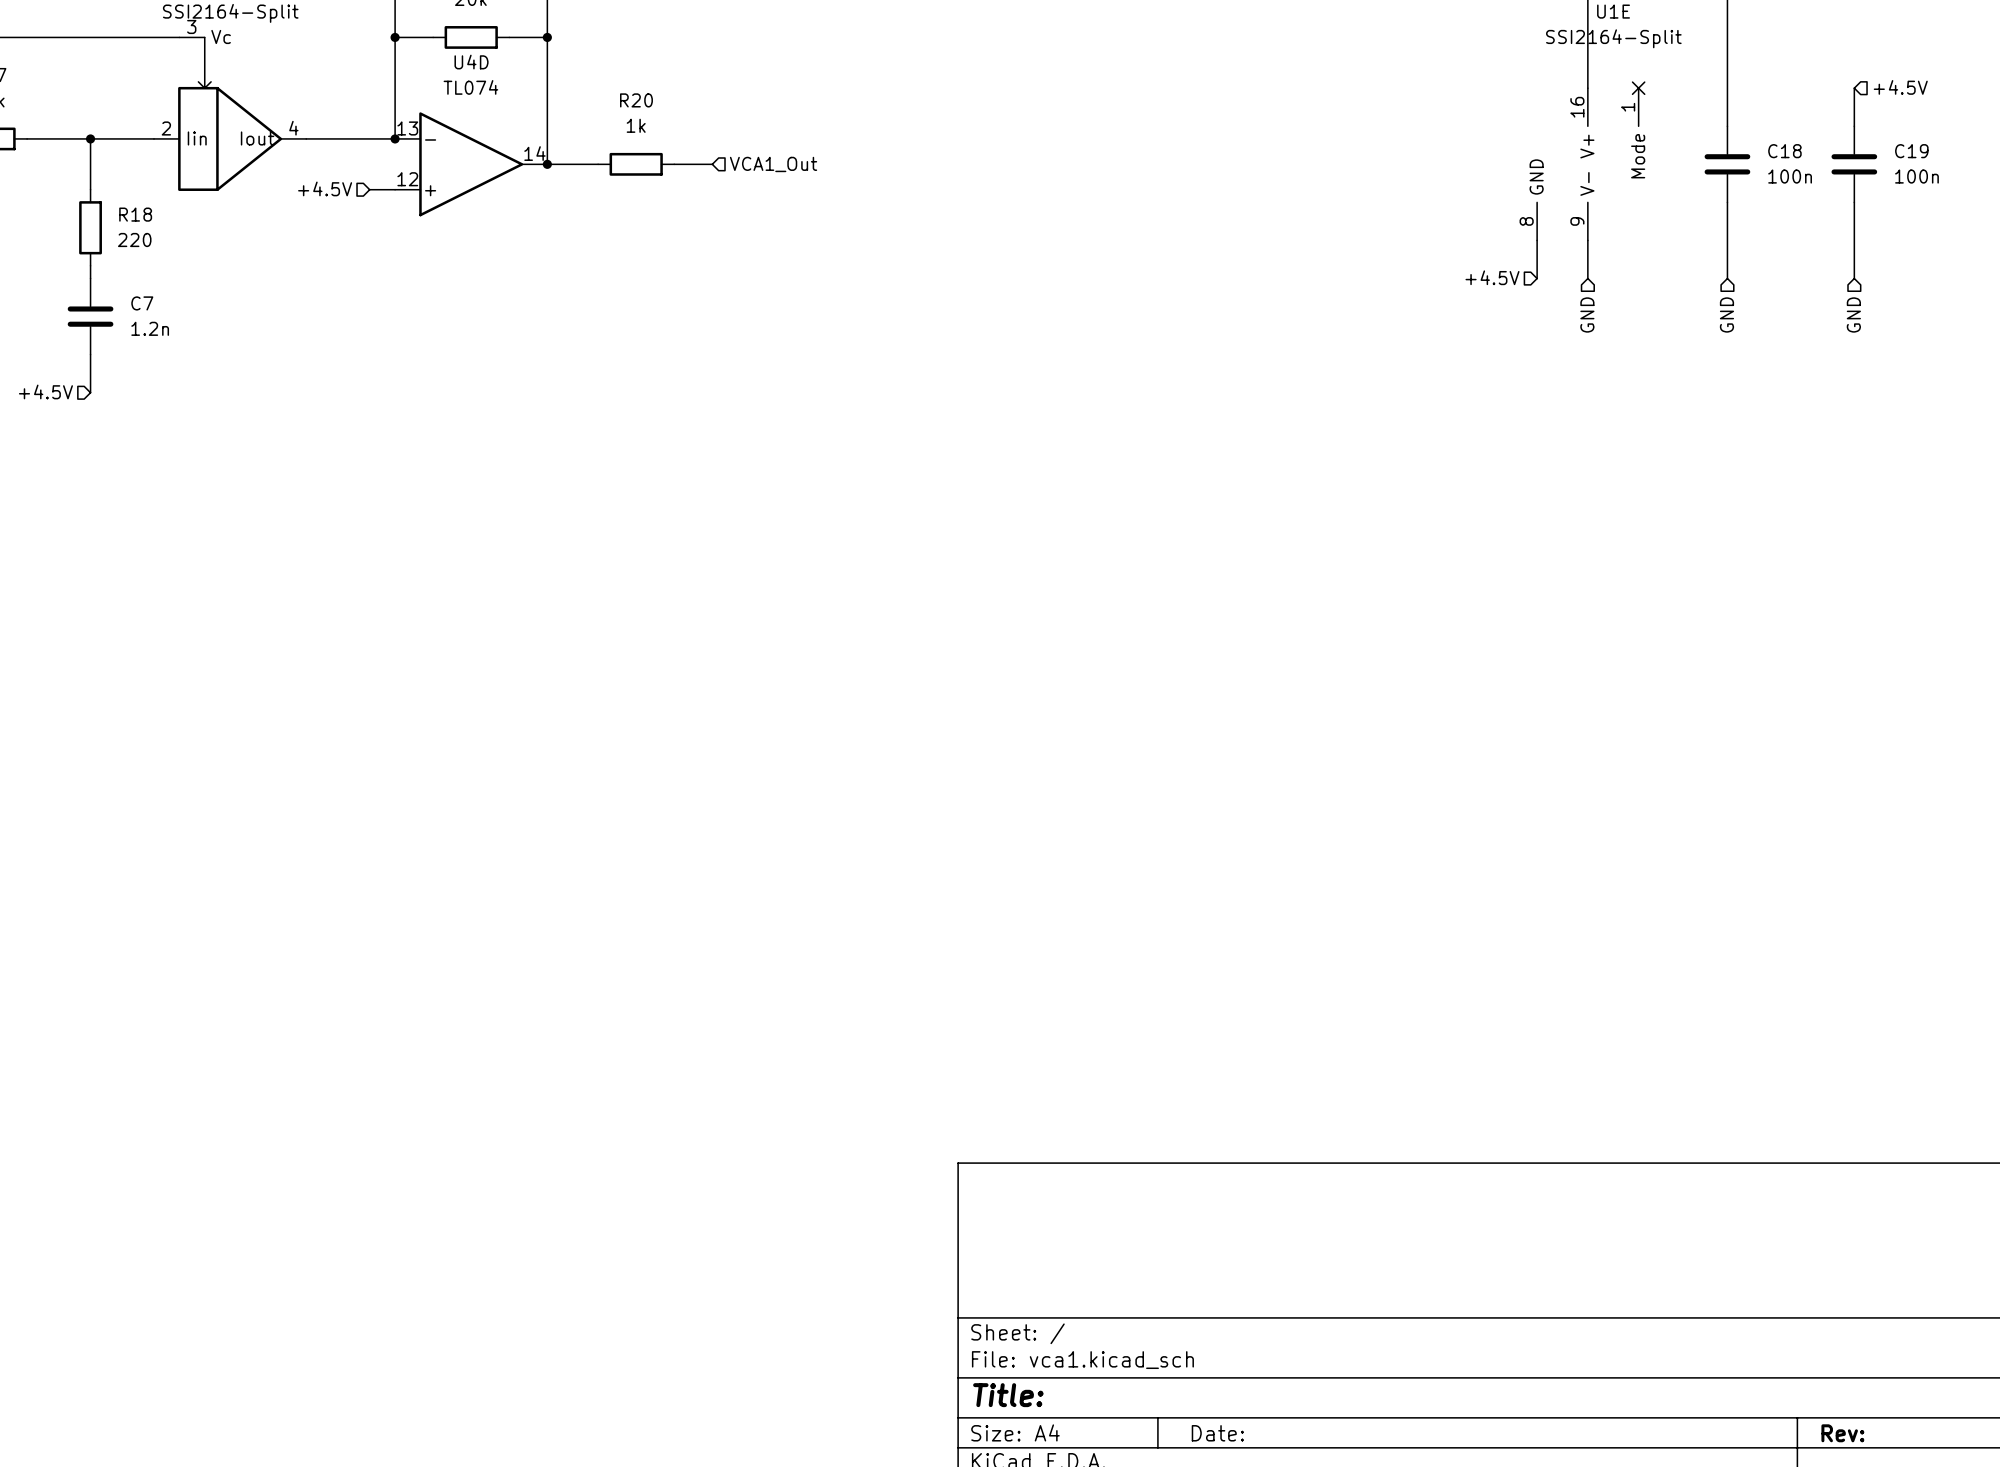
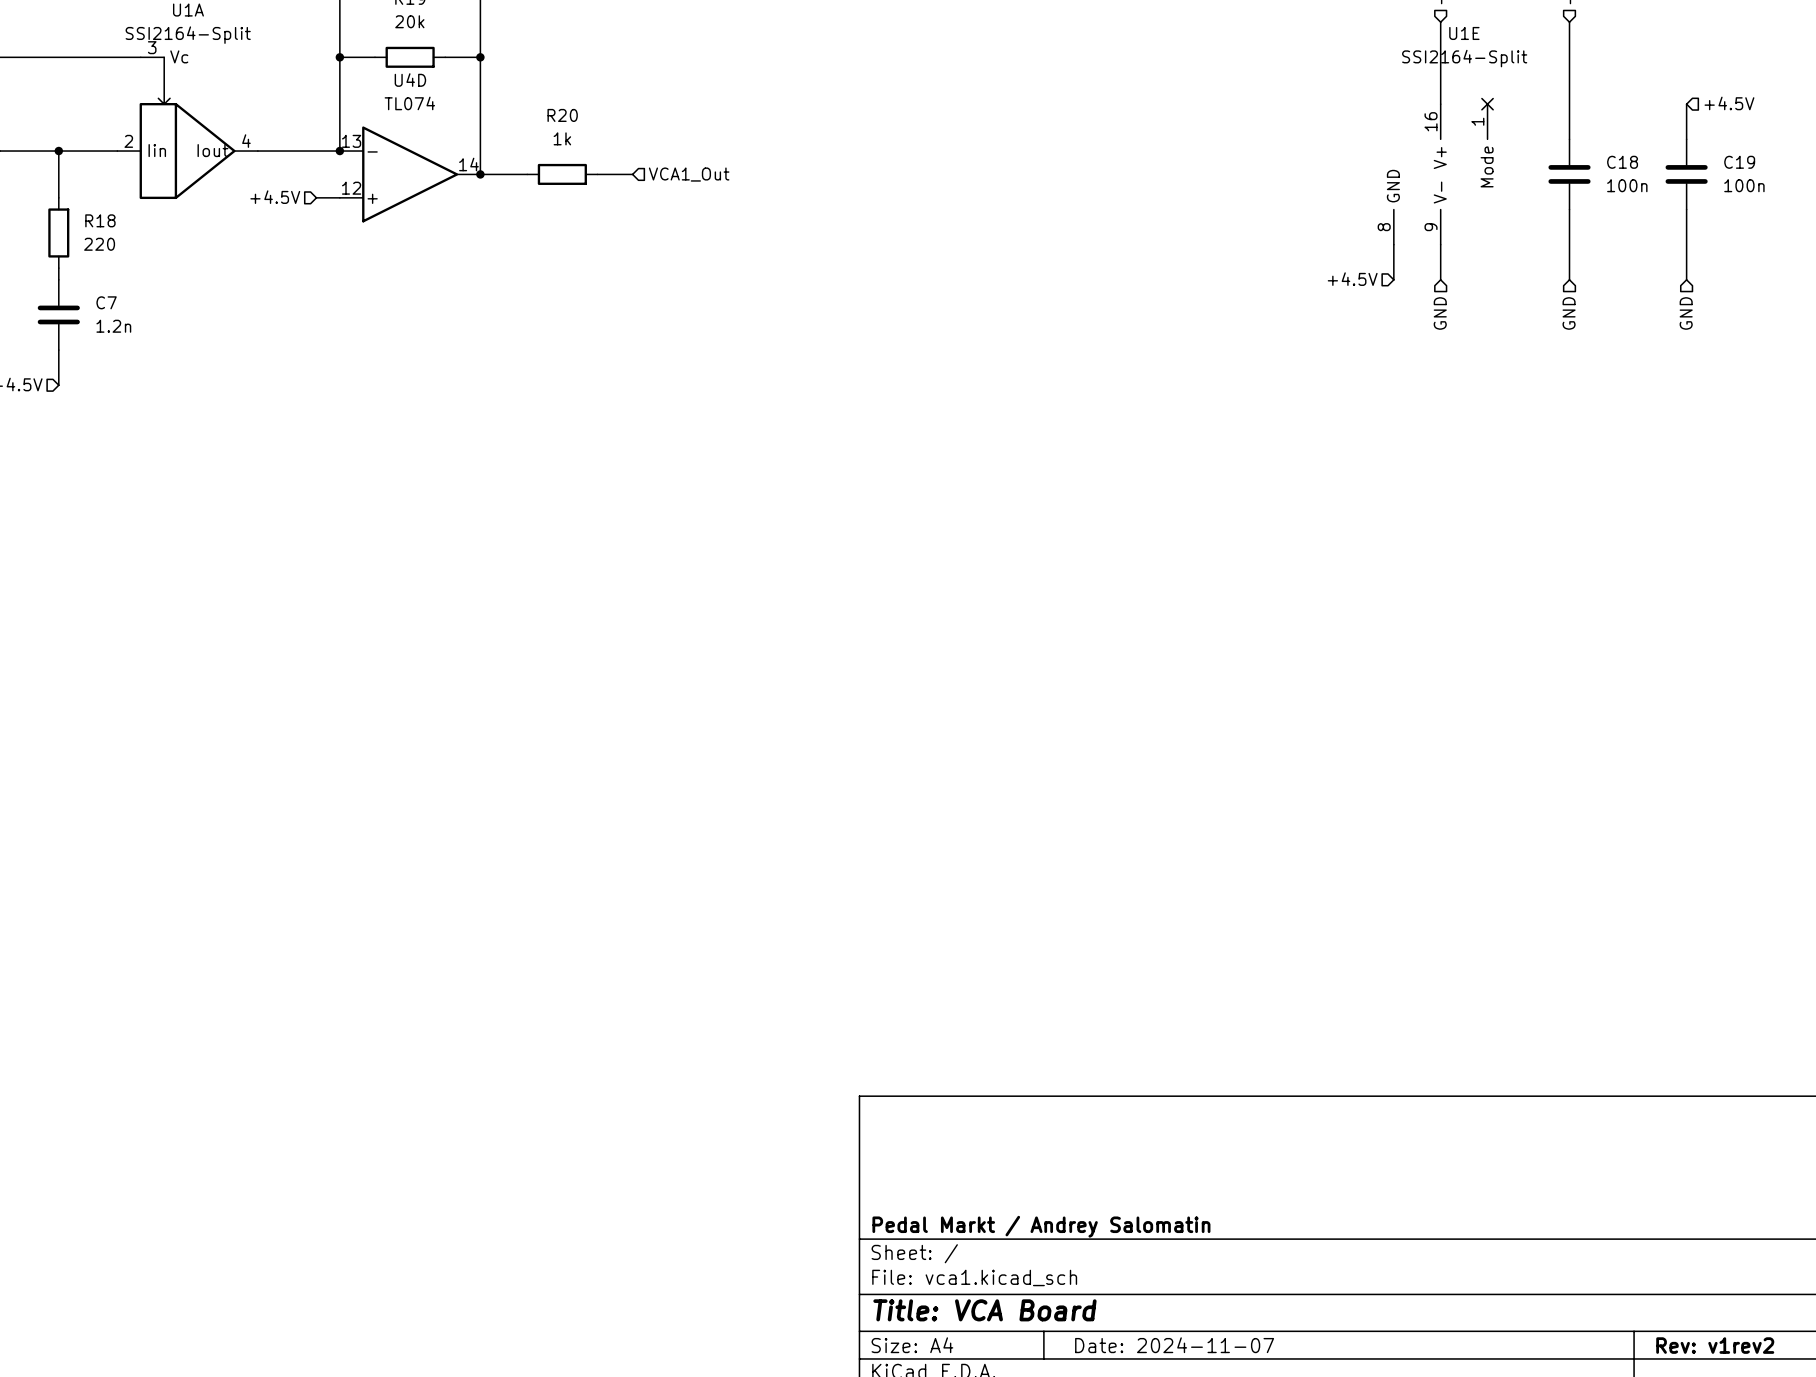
title block: none -> Pedal Markt / Andrey Salomatin (1041, 1226)
title block: Title: (1008, 1395) -> Title: VCA Board (984, 1310)
title block: Date: (1217, 1433) -> Date: 2024-11-07 (1174, 1345)
title block: Rev: (1842, 1433) -> Rev: v1rev2 (1715, 1345)

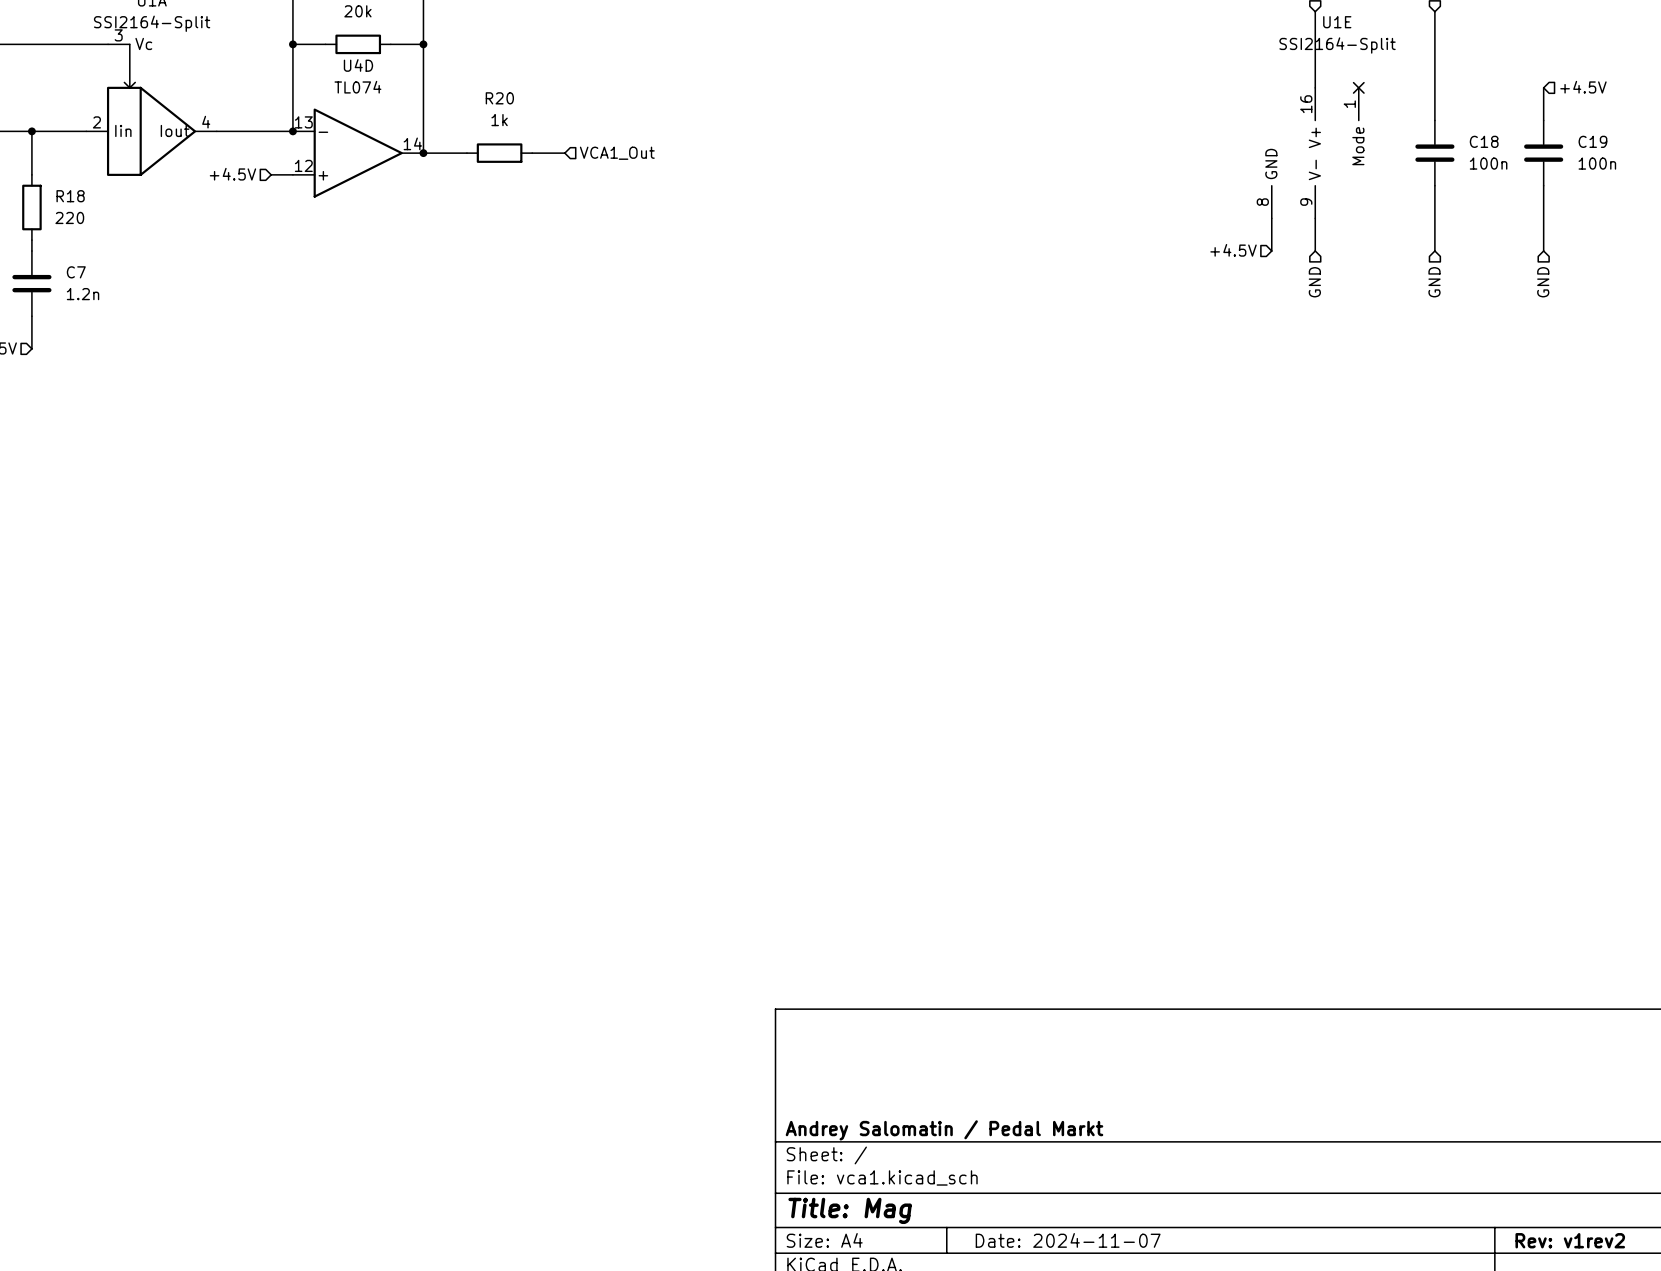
title block: Pedal Markt / Andrey Salomatin (1041, 1226) -> Andrey Salomatin / Pedal Markt (944, 1130)
title block: Title: VCA Board (984, 1310) -> Title: Mag (850, 1210)

